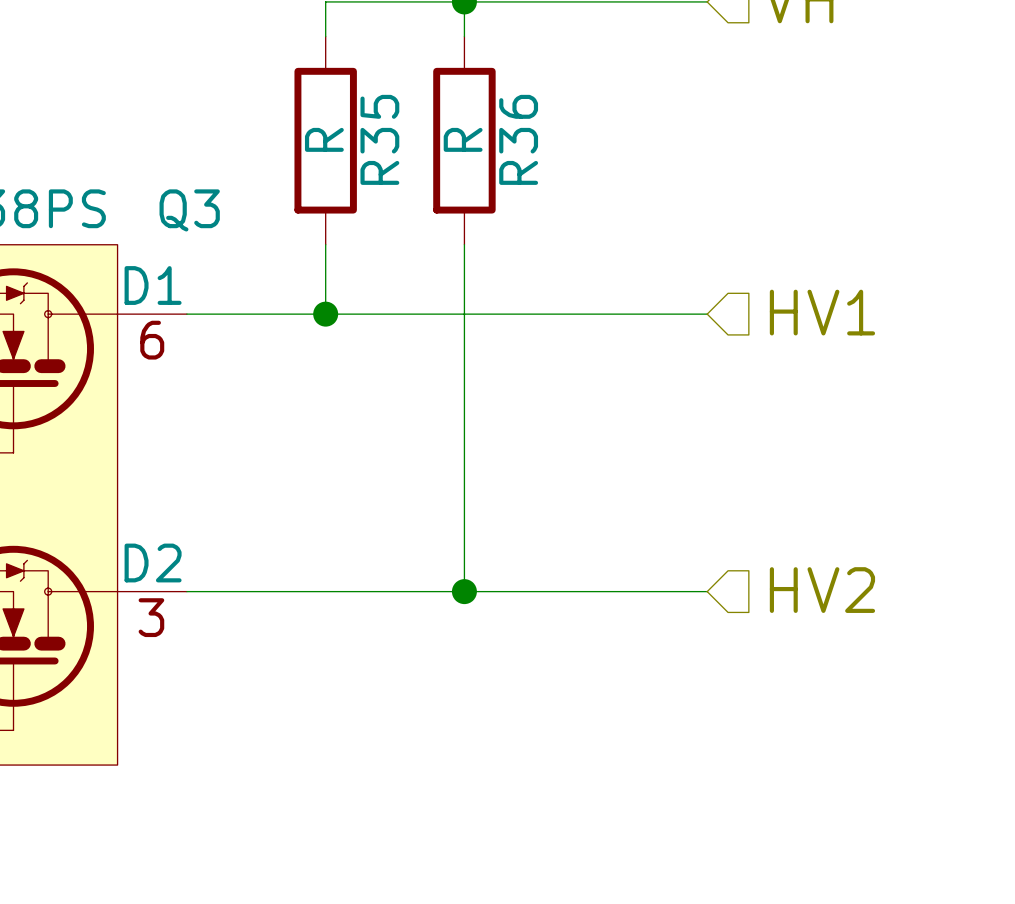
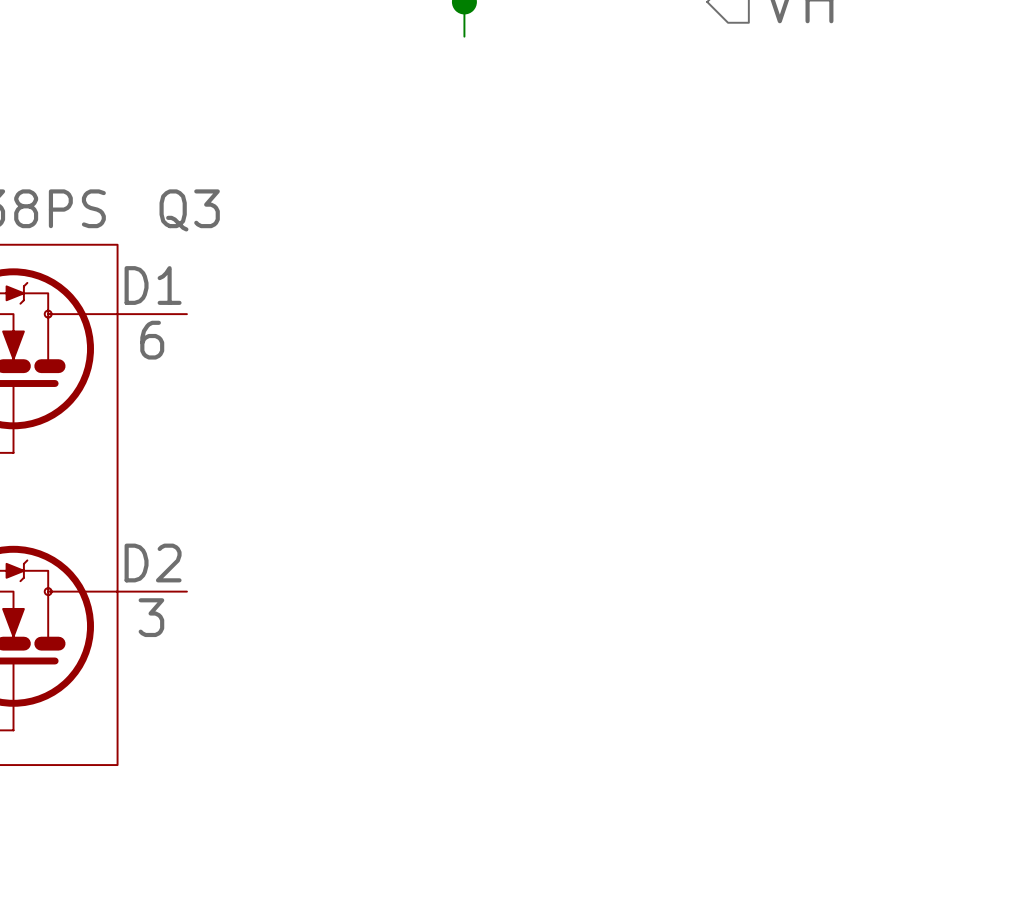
wire: (707, 1) (325, 1) (325, 36) -> none
R35: R (325, 140) -> none
R36: R (464, 140) -> none
wire: (325, 244) (325, 314) -> none
wire: (464, 244) (464, 591) -> none
hierarchical label: HV1 (822, 312) -> none
wire: (186, 314) (707, 314) -> none
junction: (325, 314) -> none
hierarchical label: HV2 (822, 590) -> none
wire: (186, 591) (707, 591) -> none
junction: (464, 591) -> none

